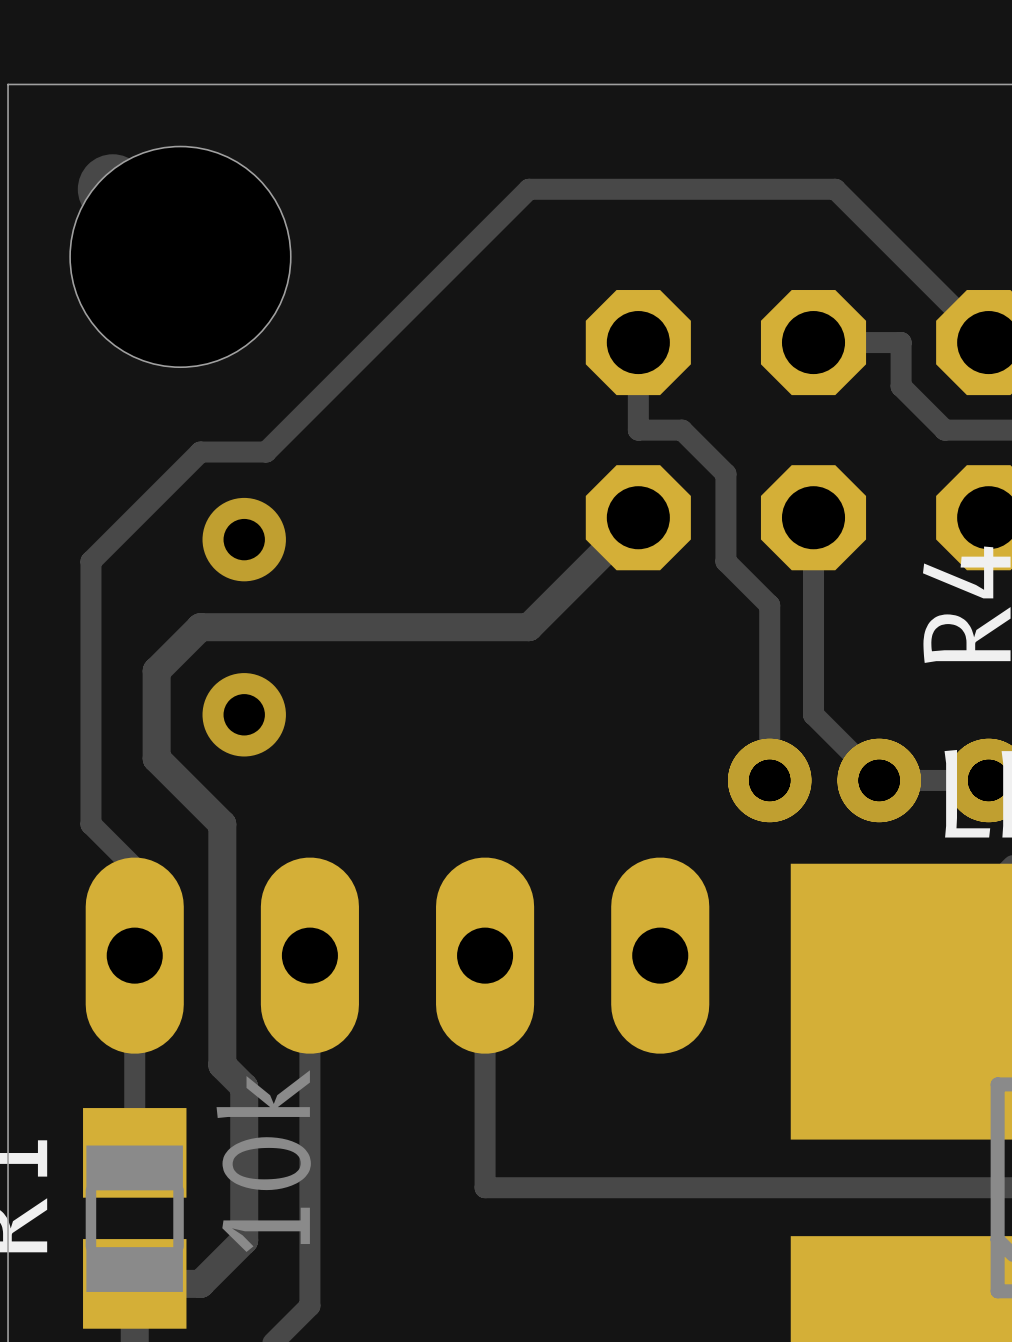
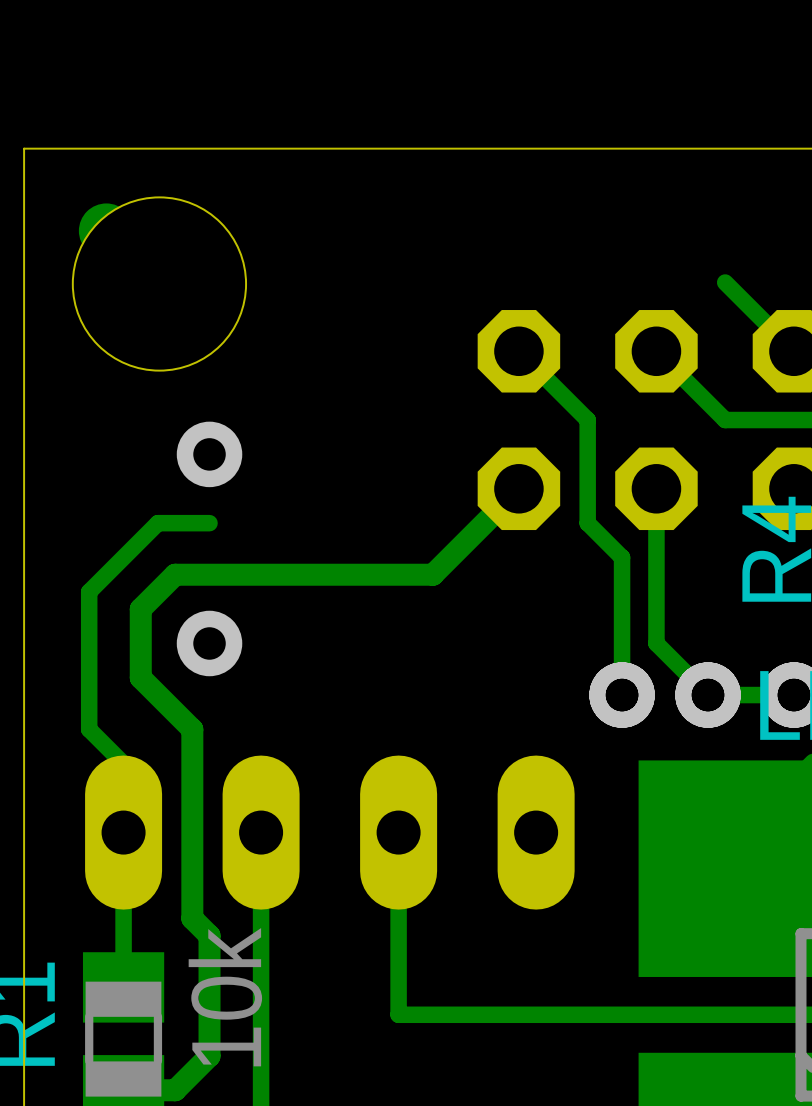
track: (901, 254) (835, 189) (528, 189) (266, 452) (200, 452) (90, 561) (90, 649) -> (209, 523) (157, 523) (89, 591)
track: (638, 342) (638, 430) (682, 430) (725, 473) -> (518, 351) (587, 420) (587, 454)
track: (813, 342) (901, 342) (901, 386) (944, 430) -> (656, 351) (725, 420) (759, 420)
via position: (244, 539) -> (209, 454)

